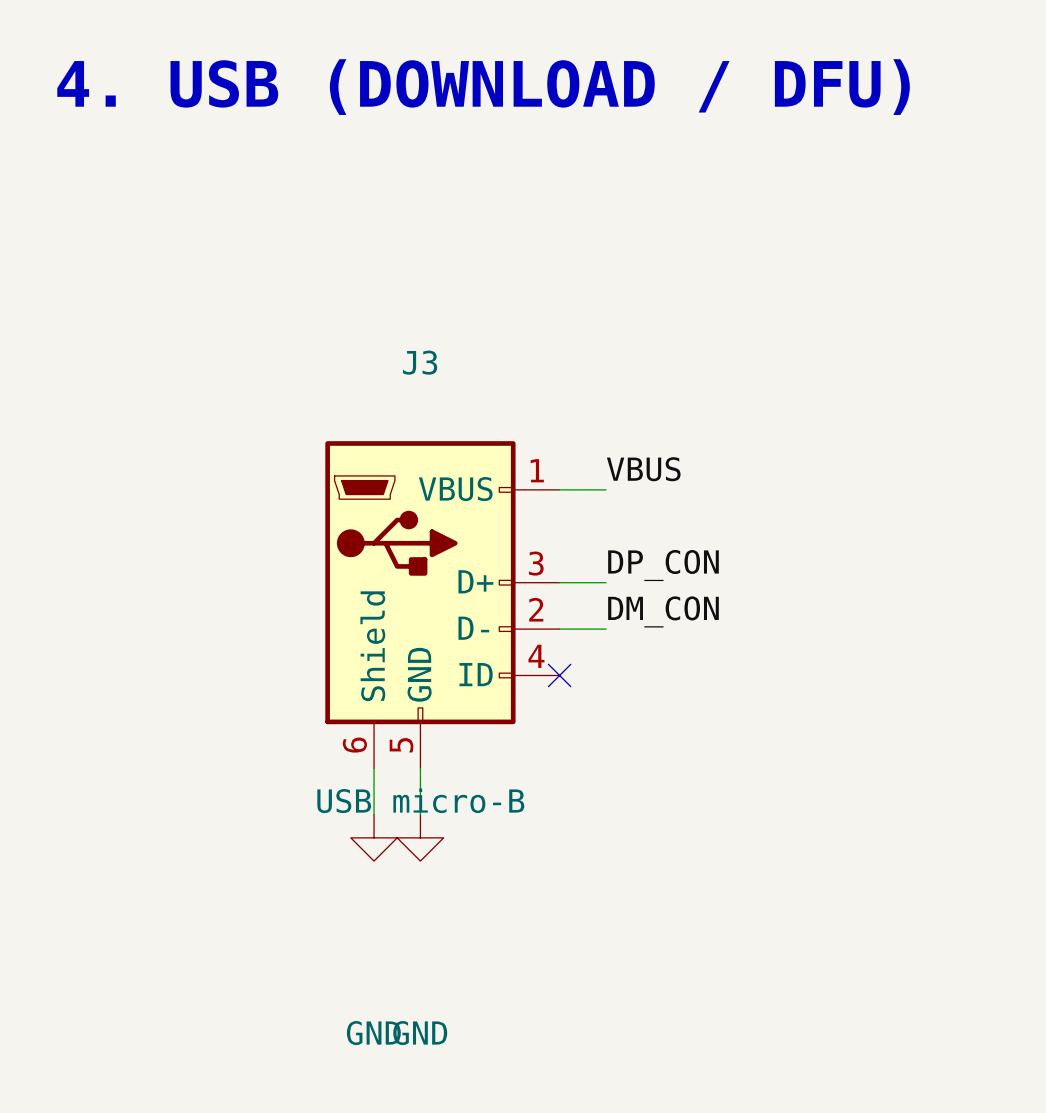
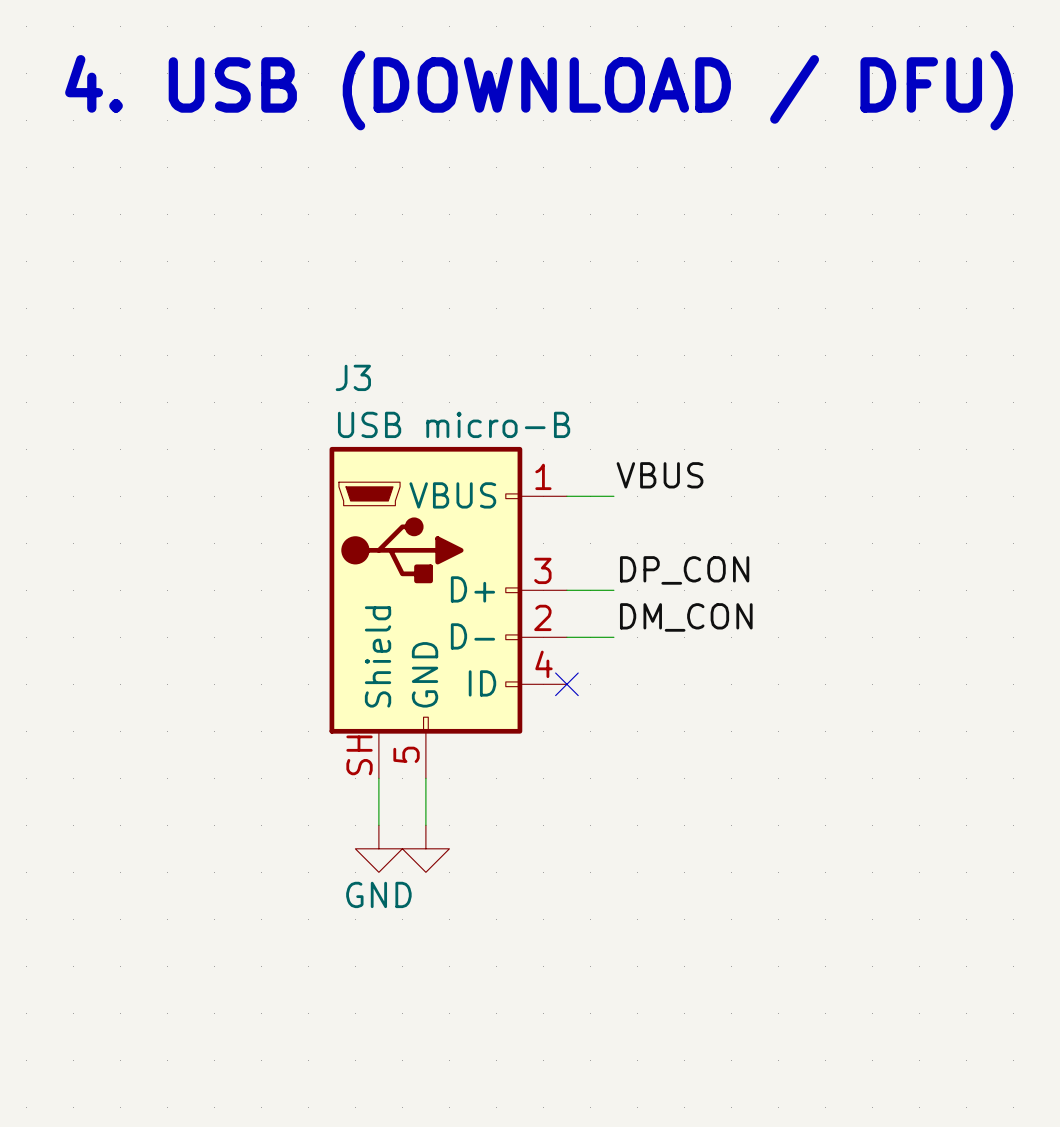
J3 name position: J3 (420, 362) -> J3 (353, 377)
J3 pin number: 6 (354, 745) -> SH (359, 755)
J3 value position: USB micro-B (420, 800) -> USB micro-B (454, 424)
power symbol text position: GND (373, 1033) -> GND (378, 894)
power symbol text: GND (420, 1033) -> none

